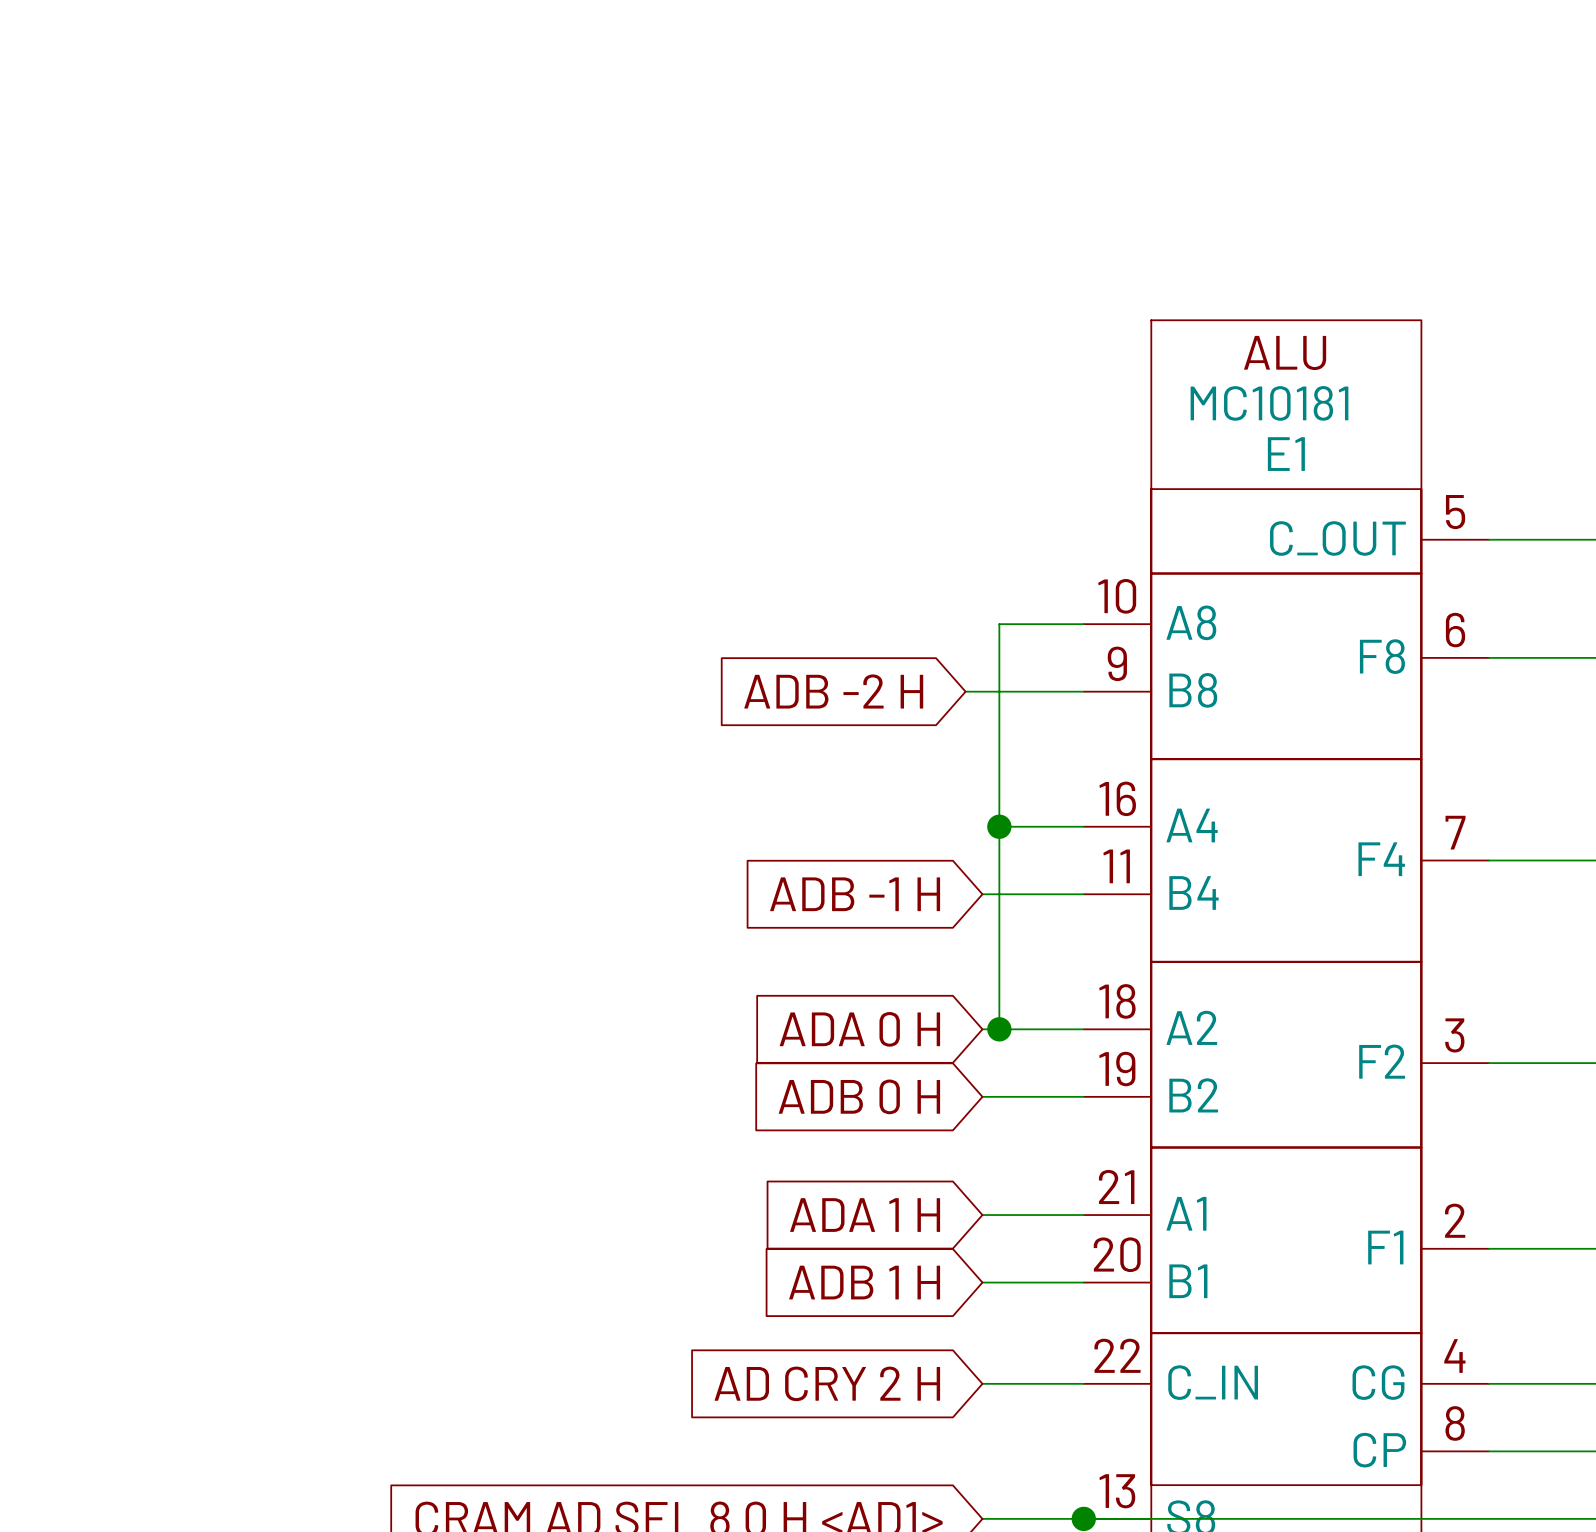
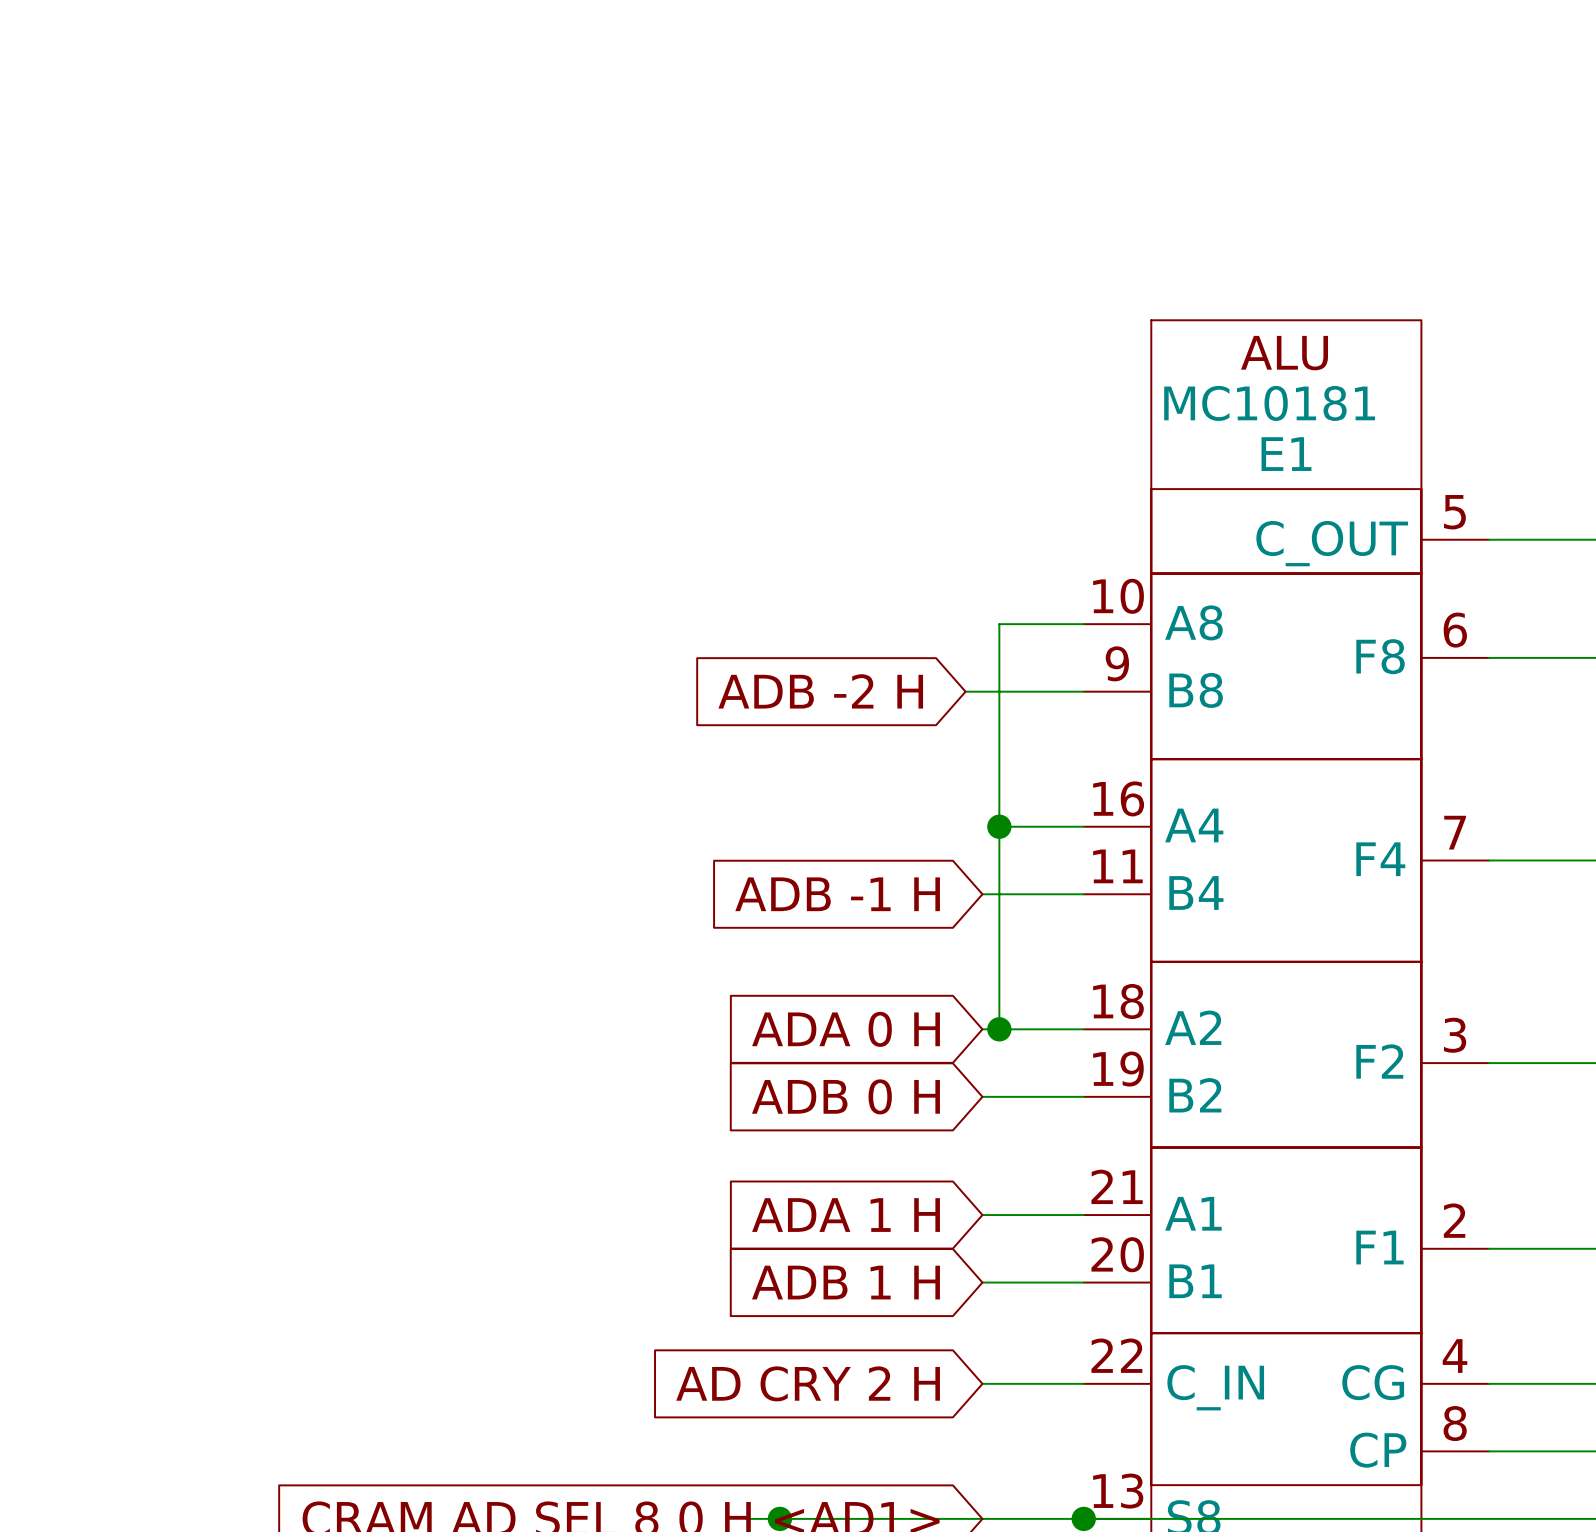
wire: none -> (746, 1518) (982, 1518)
junction: none -> (779, 1518)

